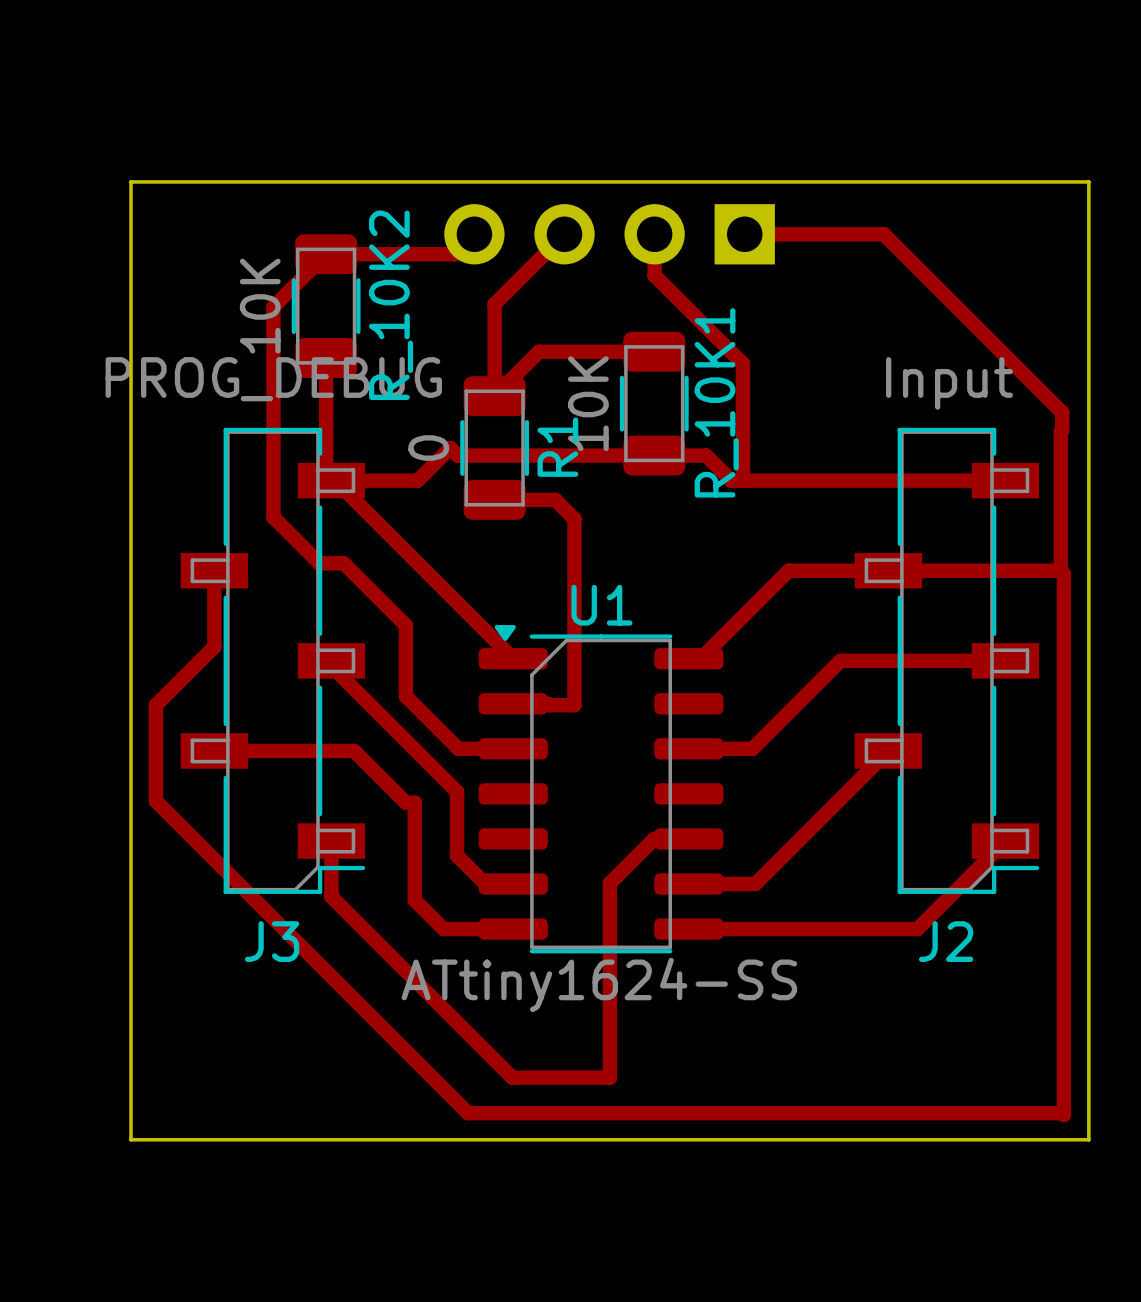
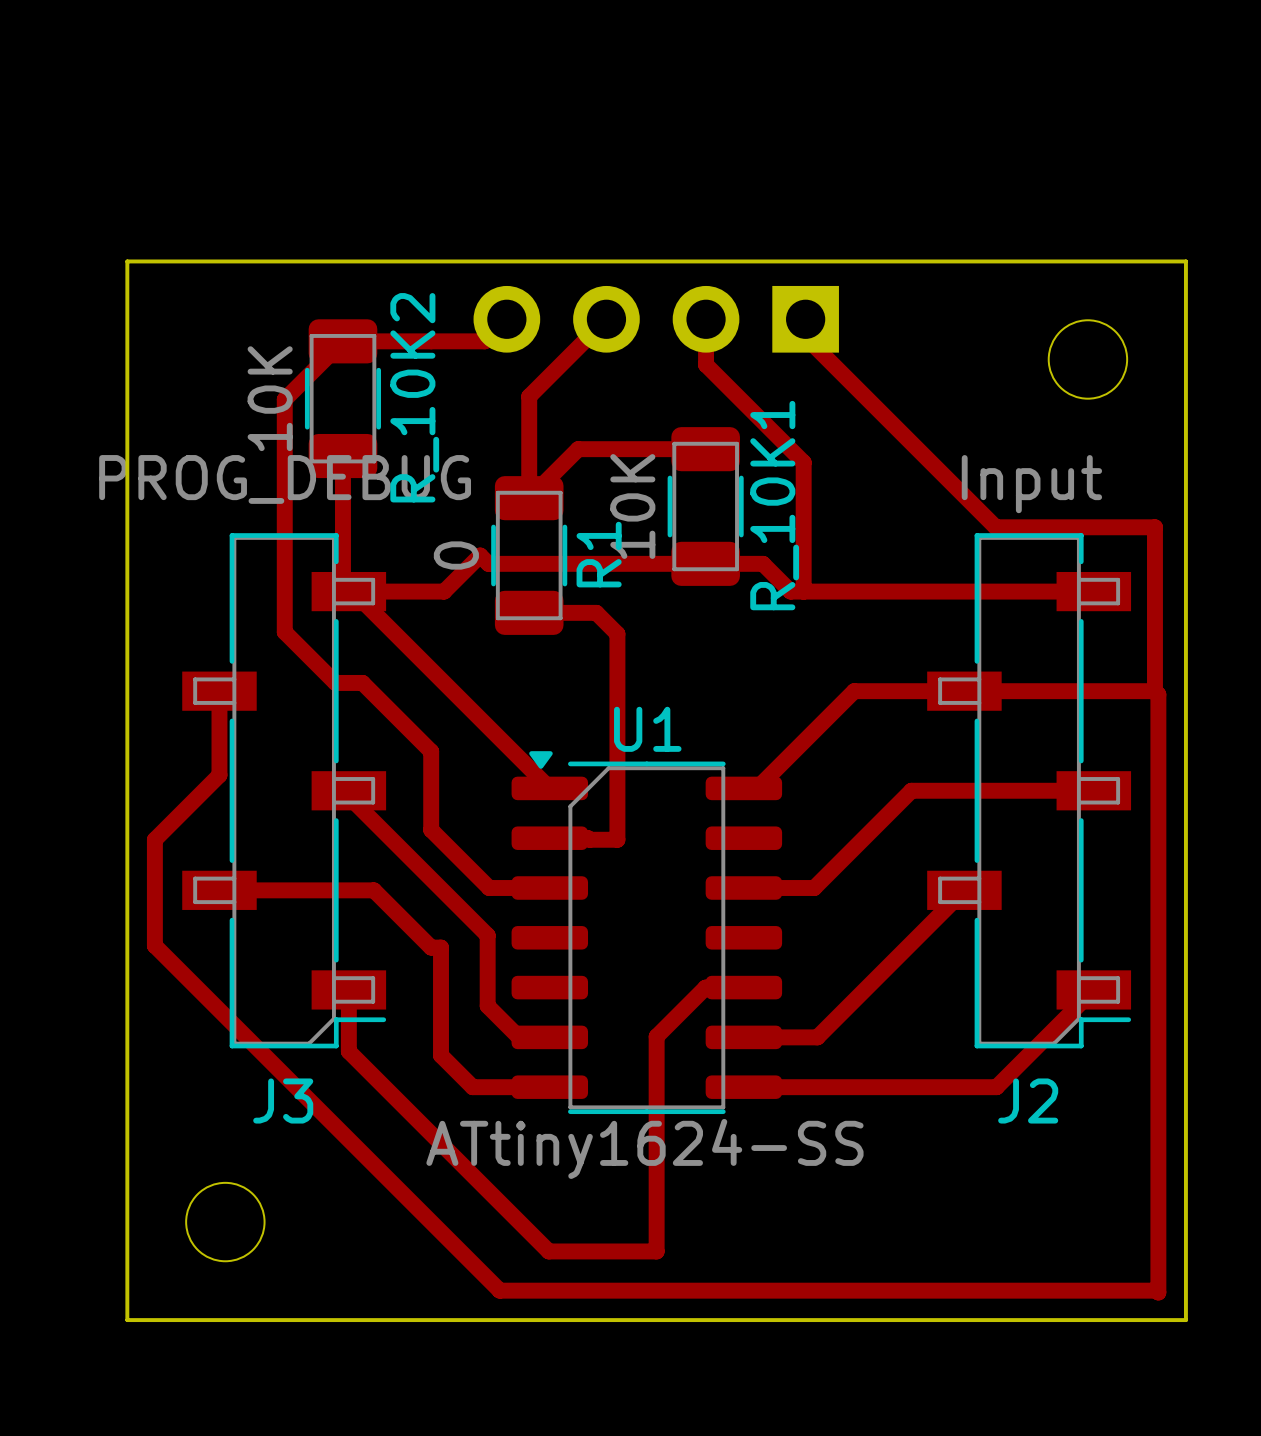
top track: (744, 234) (883, 234) (1062, 412) (1060, 431) -> (805, 319) (805, 337) (995, 527) (1154, 527) (1154, 537)
round board edge: none -> [1047, 319, 1129, 400]
round board edge: none -> [185, 1181, 266, 1263]

